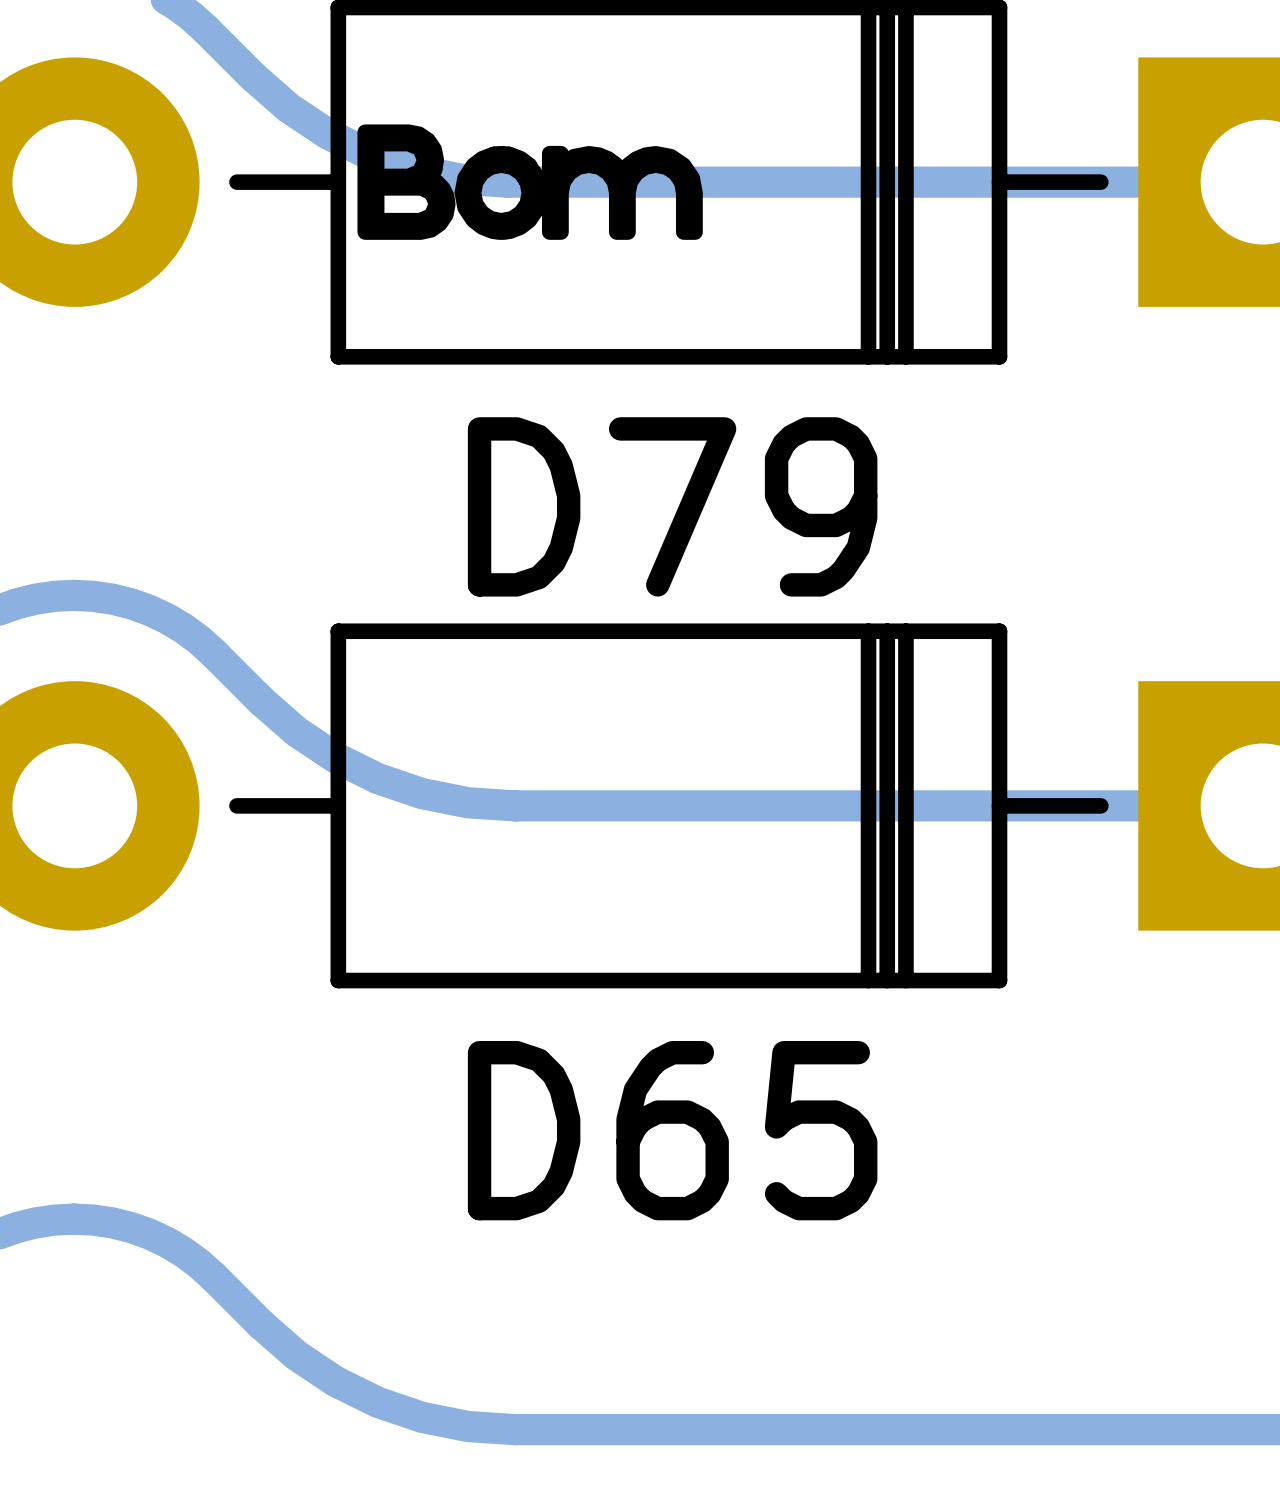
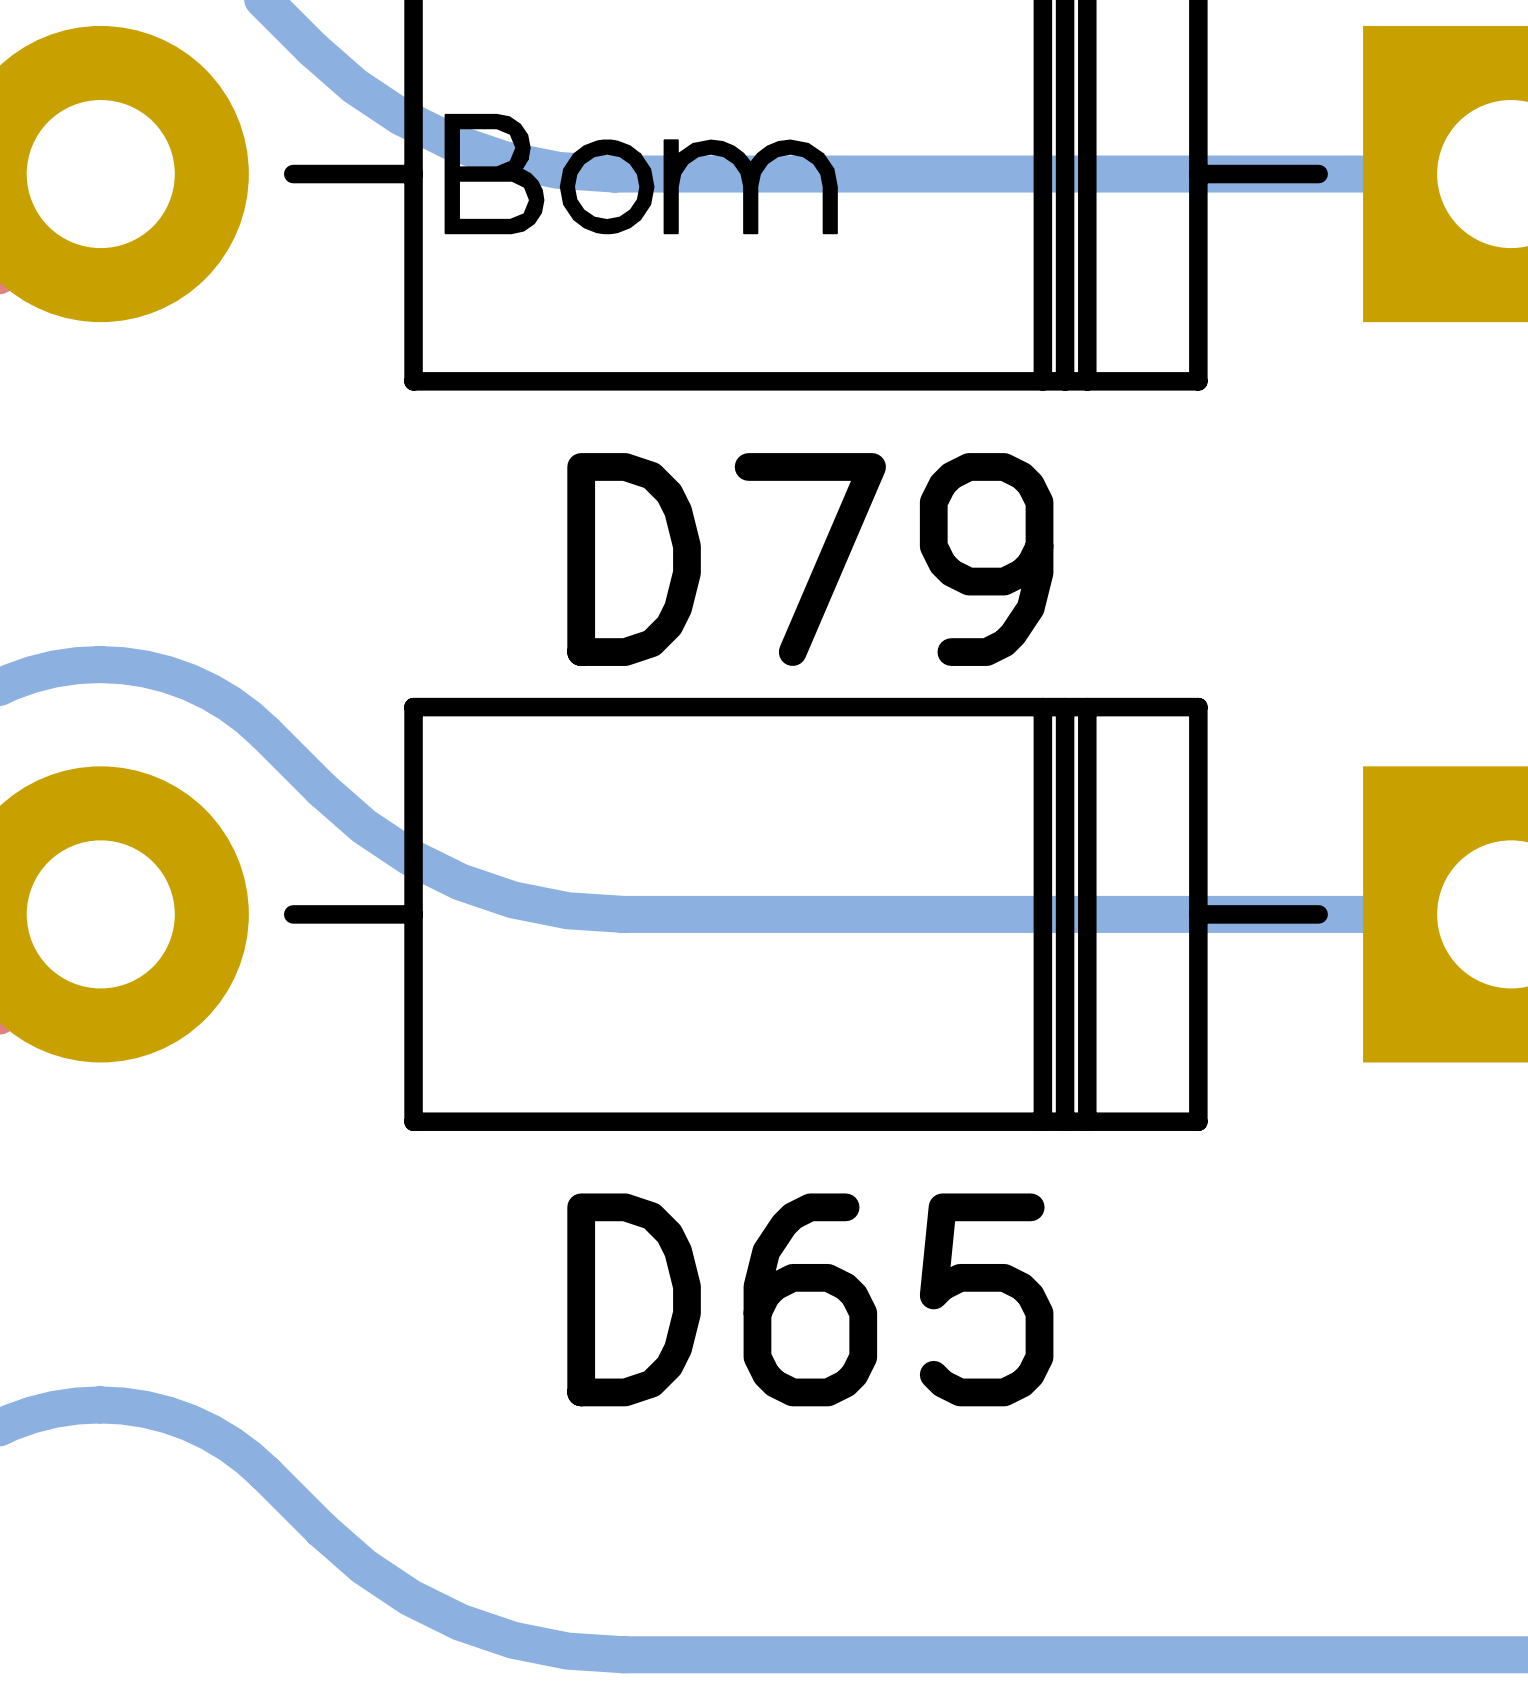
drawing shape: [357, 124, 703, 240] -> [444, 113, 838, 235]

